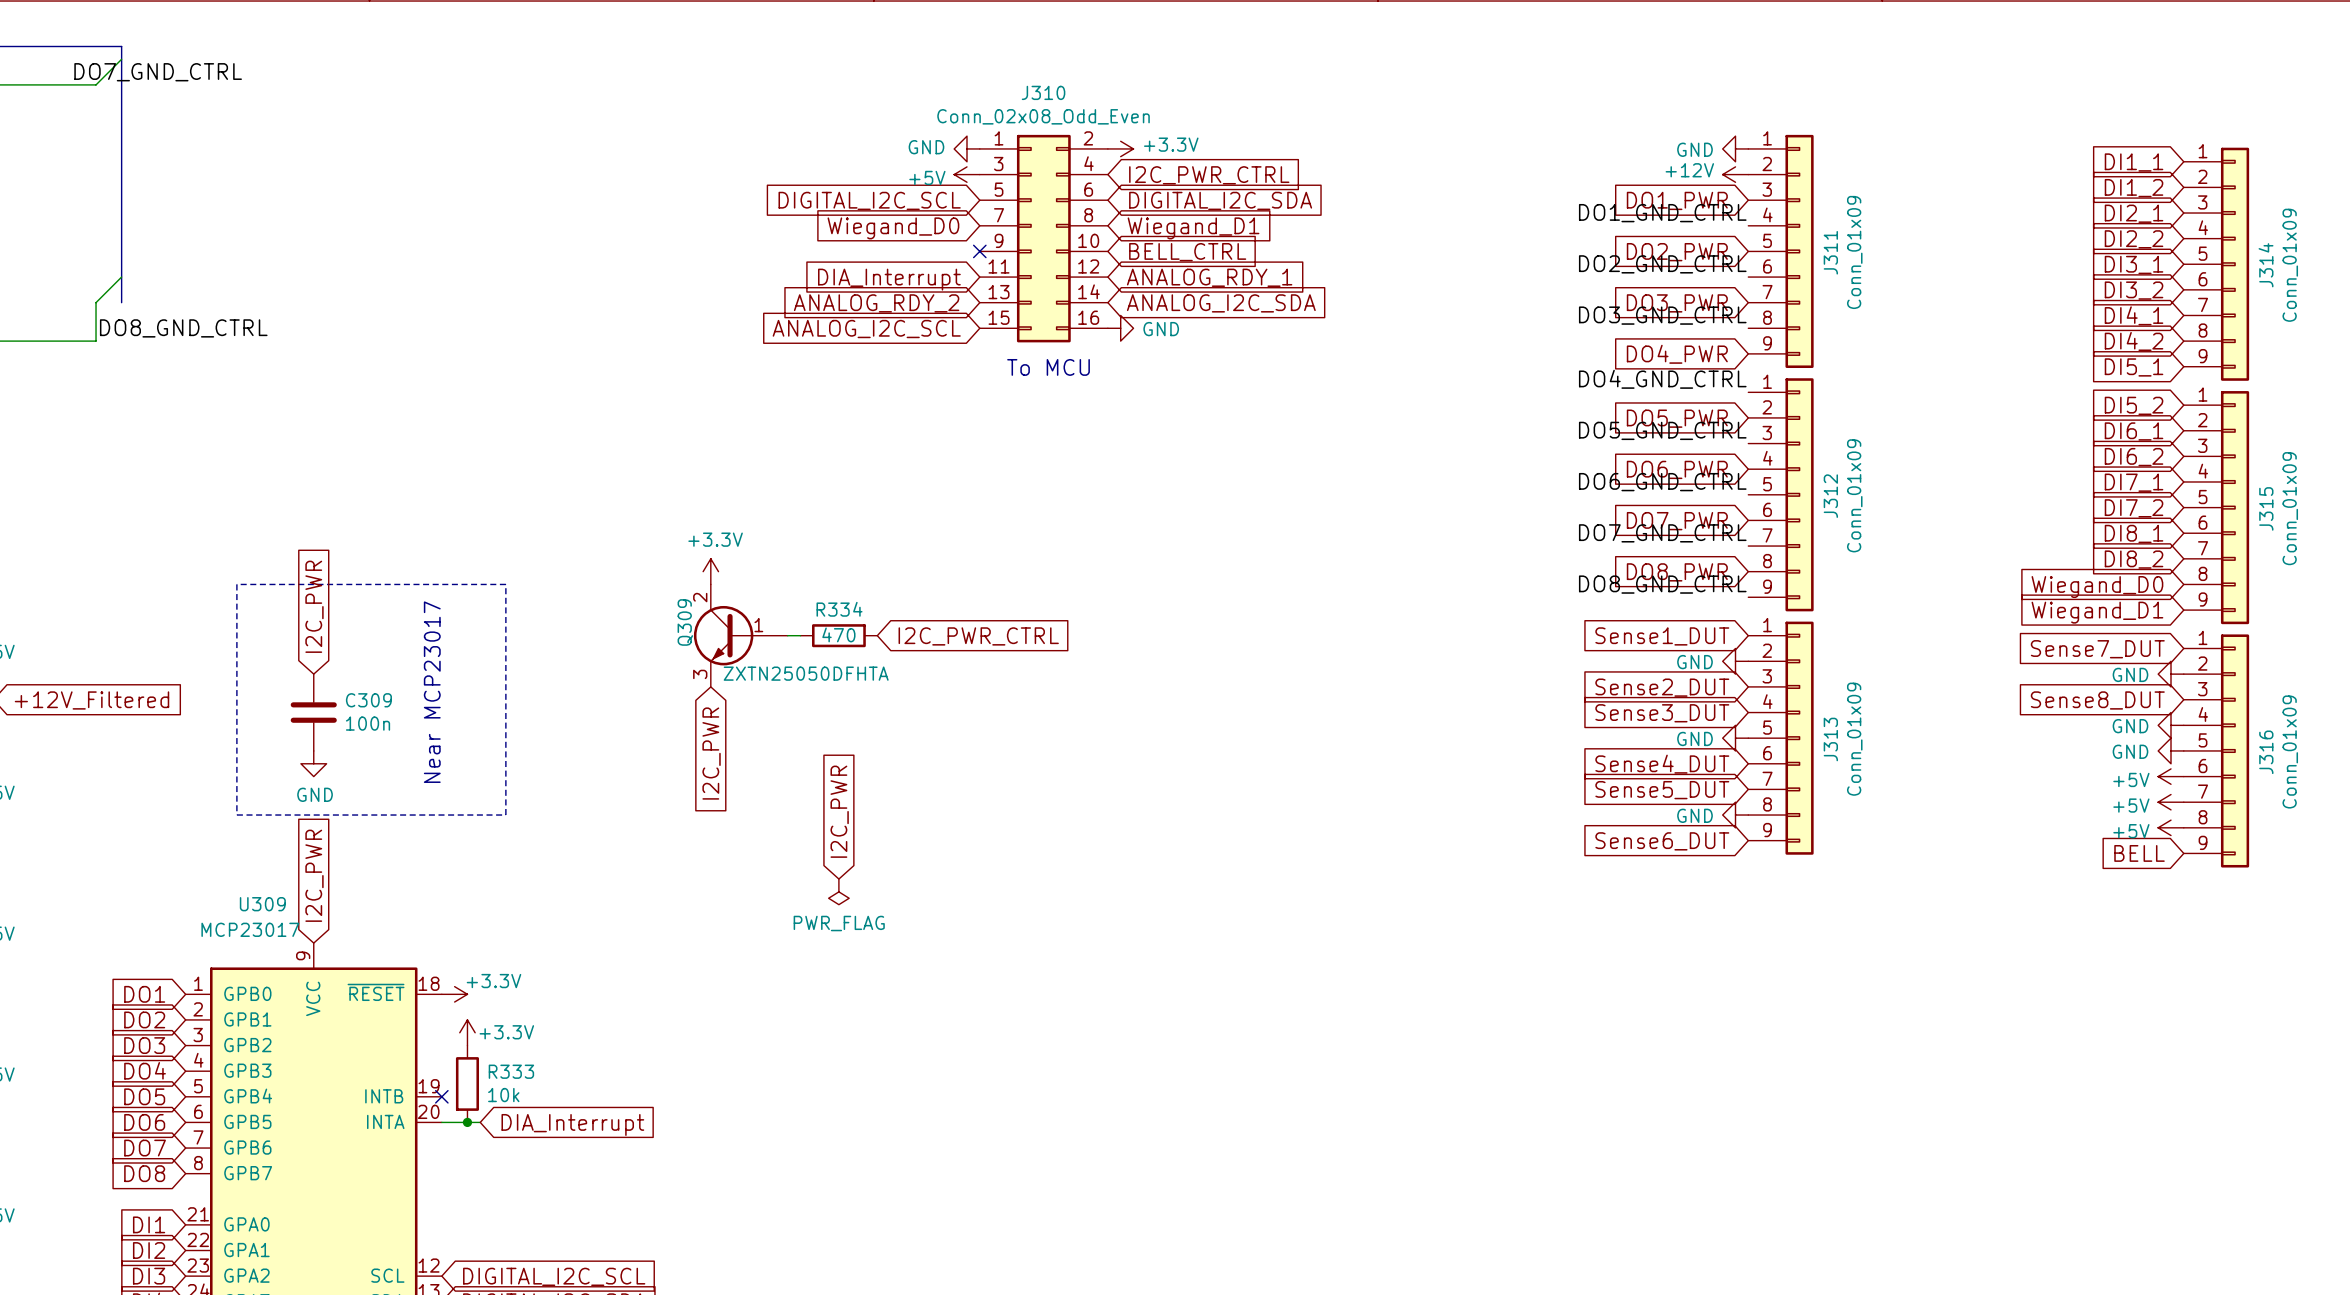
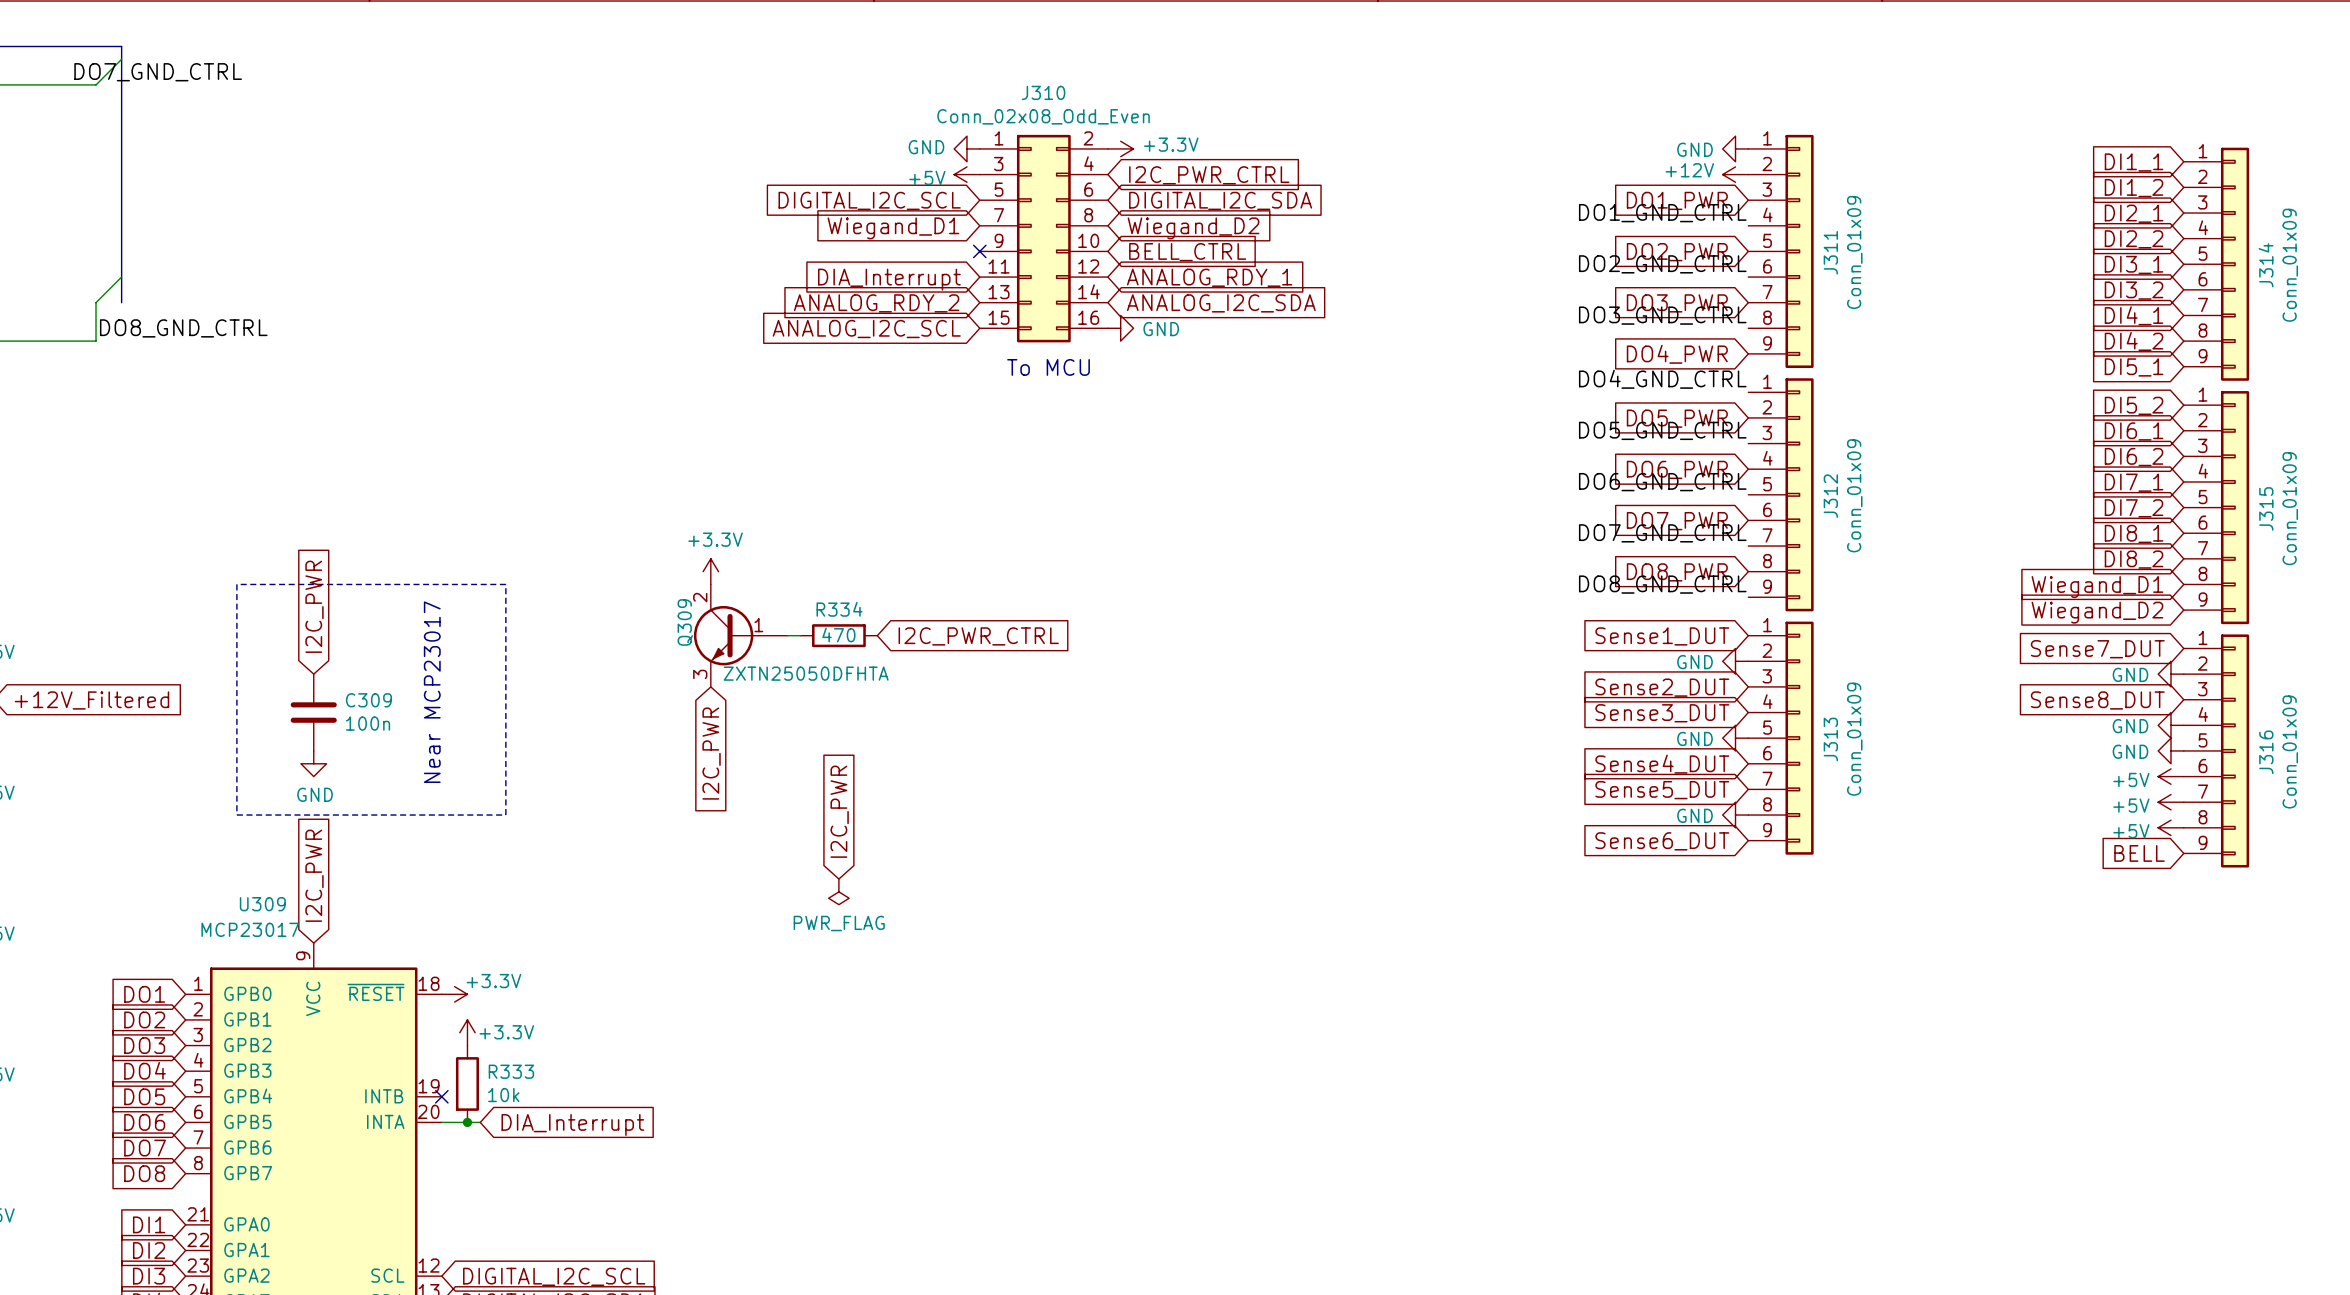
global label: Wiegand_D0 (893, 228) -> Wiegand_D1 (893, 228)
global label: Wiegand_D1 (1193, 228) -> Wiegand_D2 (1193, 228)
global label: Wiegand_D0 (2097, 587) -> Wiegand_D1 (2097, 587)
global label: Wiegand_D1 (2097, 612) -> Wiegand_D2 (2097, 612)

